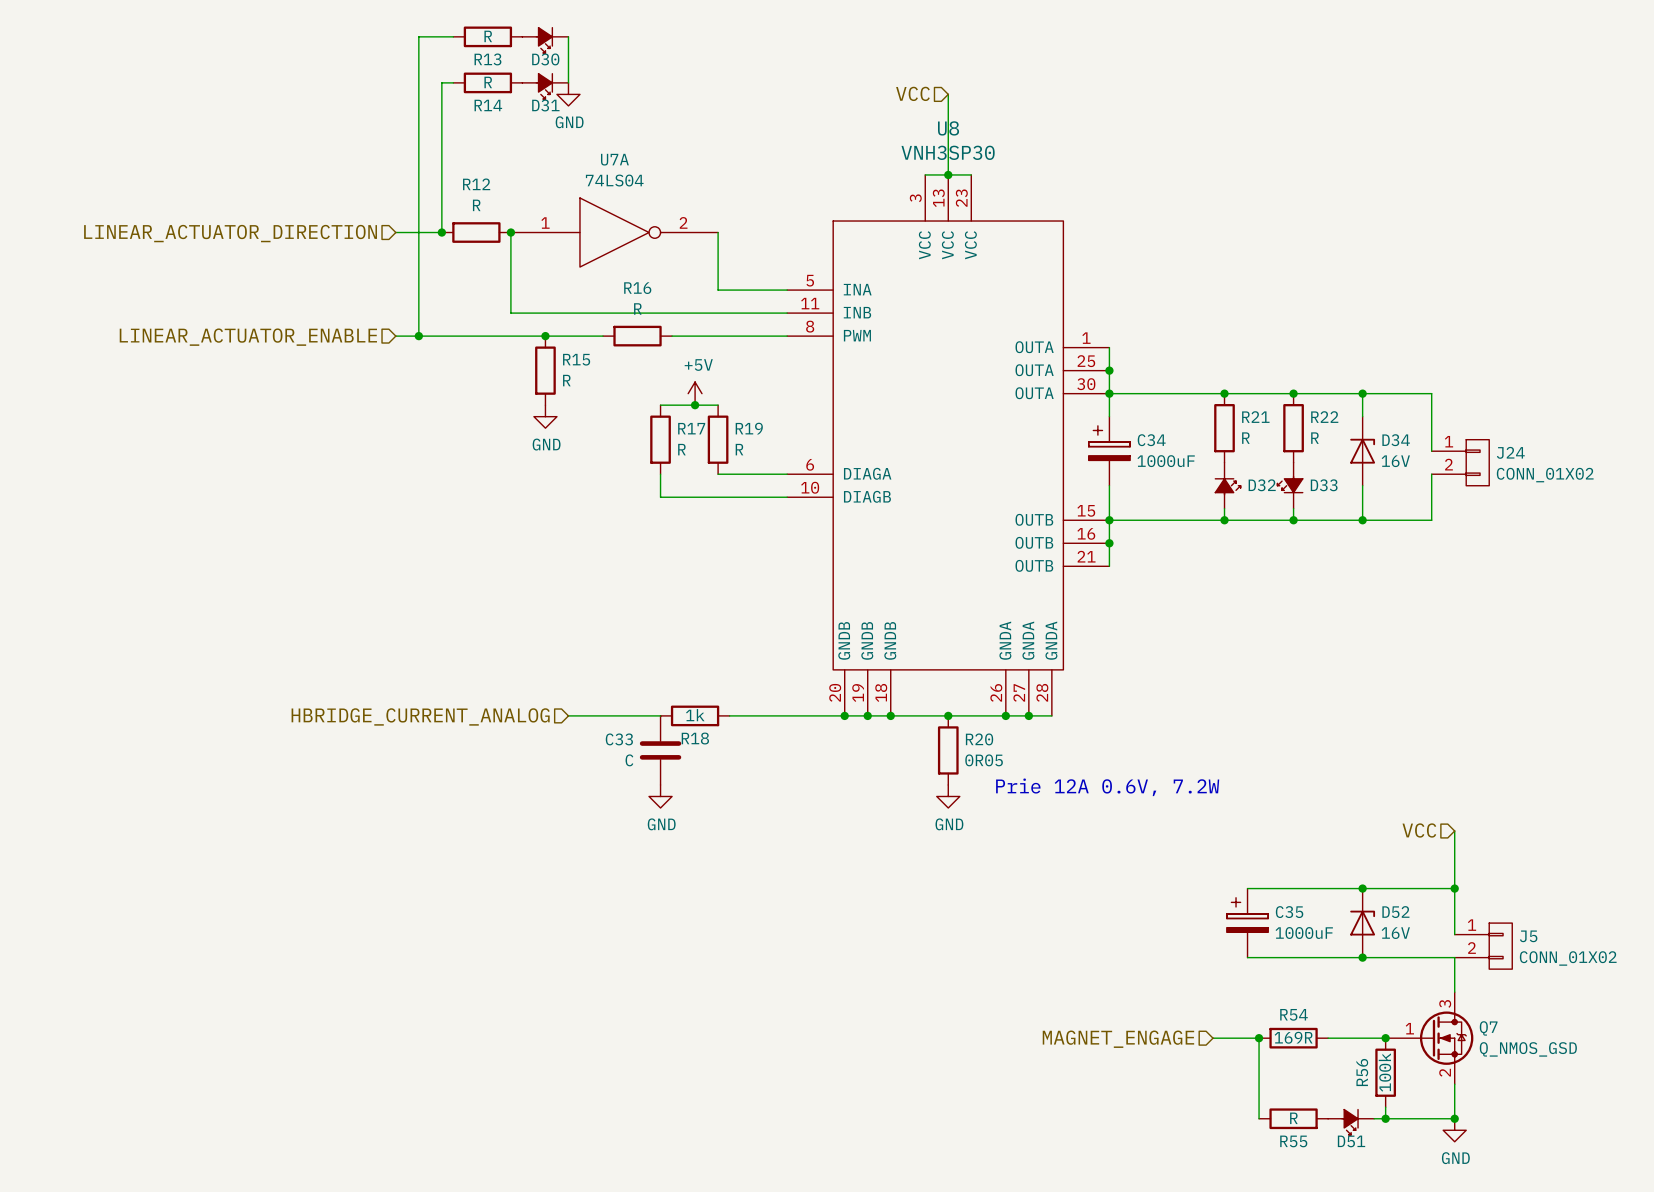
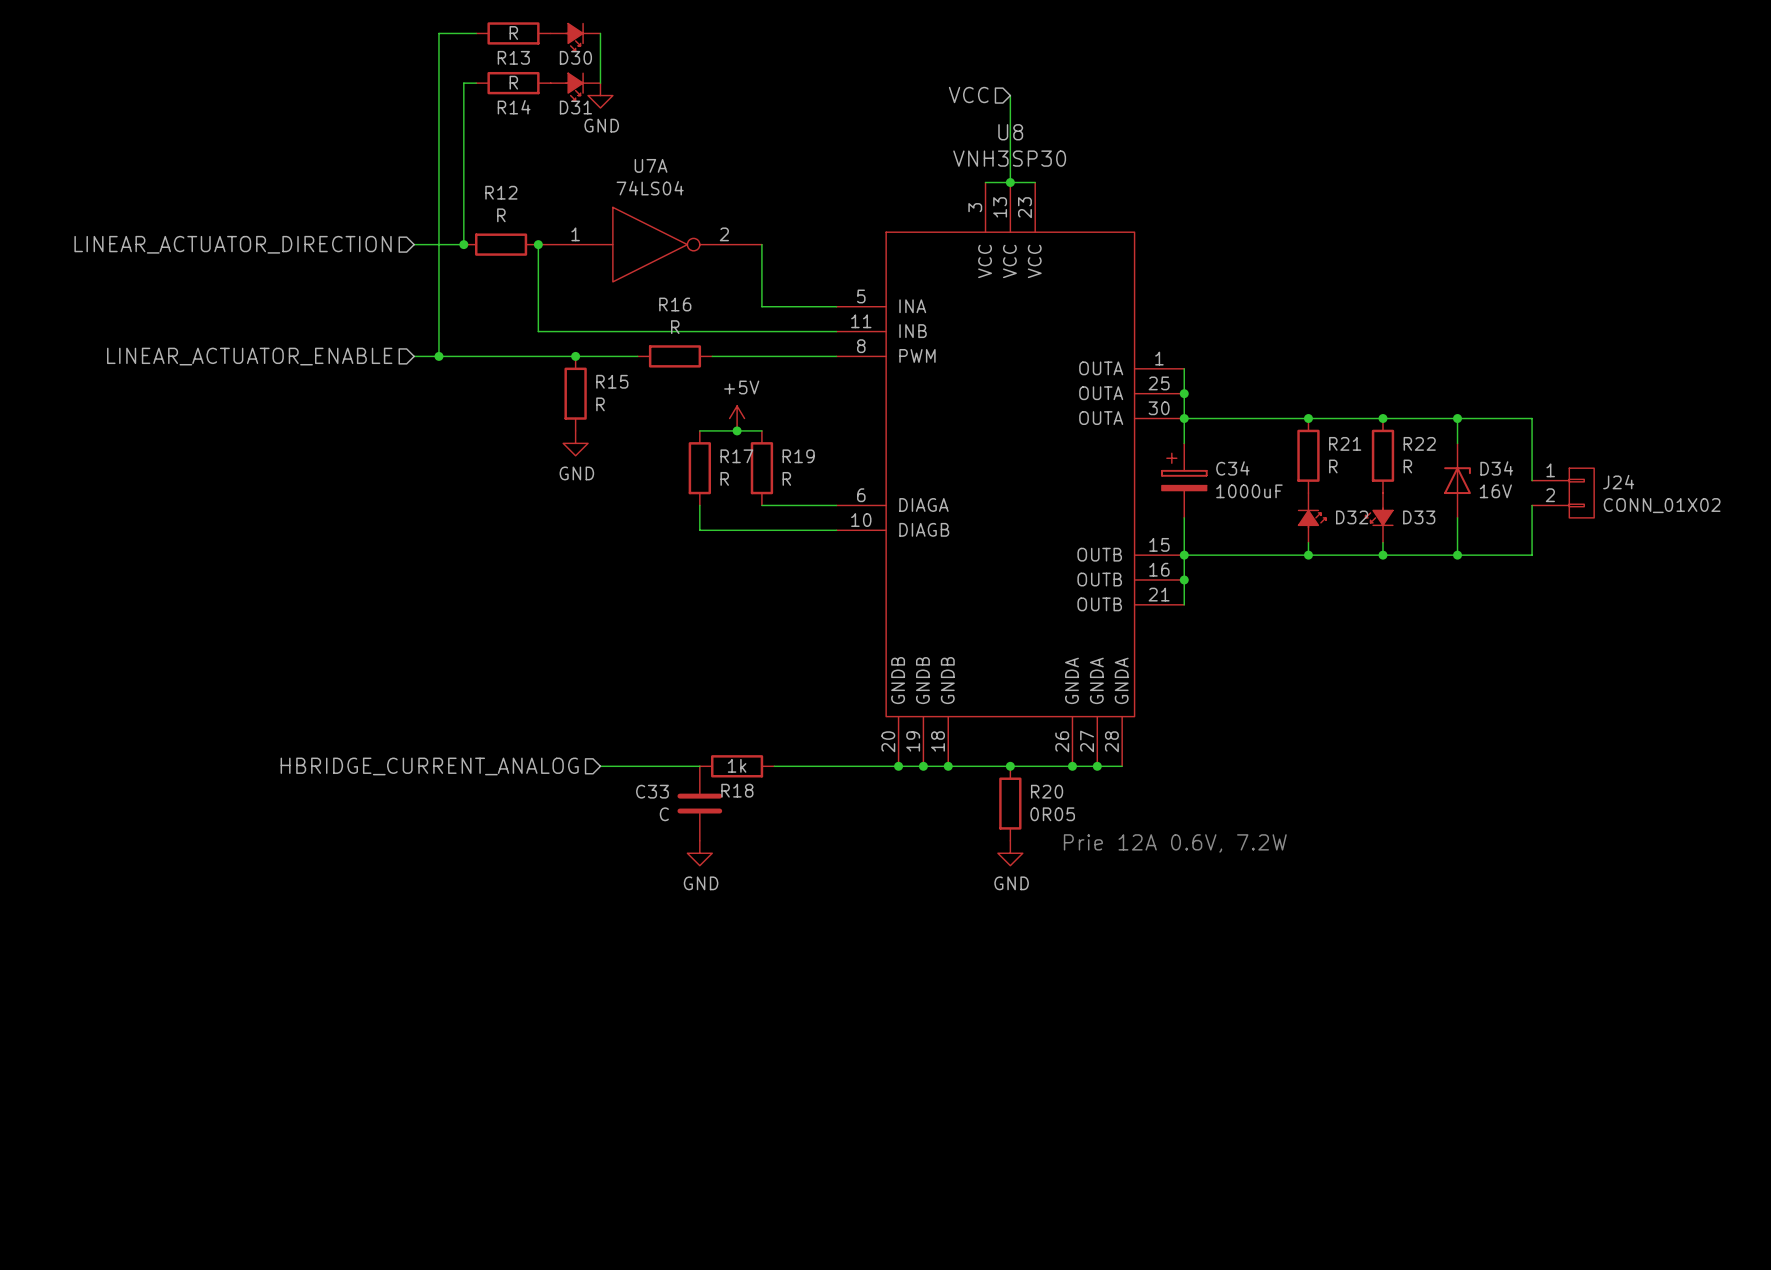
hierarchical label: VCC (1419, 830) -> none
wire: (1454, 831) (1454, 934) -> none
wire: (1247, 888) (1454, 888) -> none
junction: (1362, 888) -> none
junction: (1454, 888) -> none
C35: 1000uF (1247, 923) -> none
D52: 16V (1362, 923) -> none
J5: CONN_01X02 (1483, 946) -> none
wire: (1247, 957) (1454, 957) (1454, 992) -> none
junction: (1362, 957) -> none
wire: (1213, 1038) (1259, 1038) (1259, 1118) -> none
junction: (1259, 1038) -> none
R54: 169R (1293, 1038) -> none
wire: (1328, 1038) (1385, 1038) -> none
junction: (1385, 1038) -> none
Q7: Q_NMOS_GSD (1429, 1038) -> none
hierarchical label: MAGNET_ENGAGE (1118, 1039) -> none
R56: 100k (1385, 1072) -> none
wire: (1454, 1084) (1454, 1118) (1374, 1118) -> none
wire: (1385, 1107) (1385, 1118) -> none
R55: R (1293, 1118) -> none
junction: (1385, 1118) -> none
junction: (1454, 1118) -> none
D51: (1351, 1122) -> none
power symbol: GND (1454, 1130) -> none

